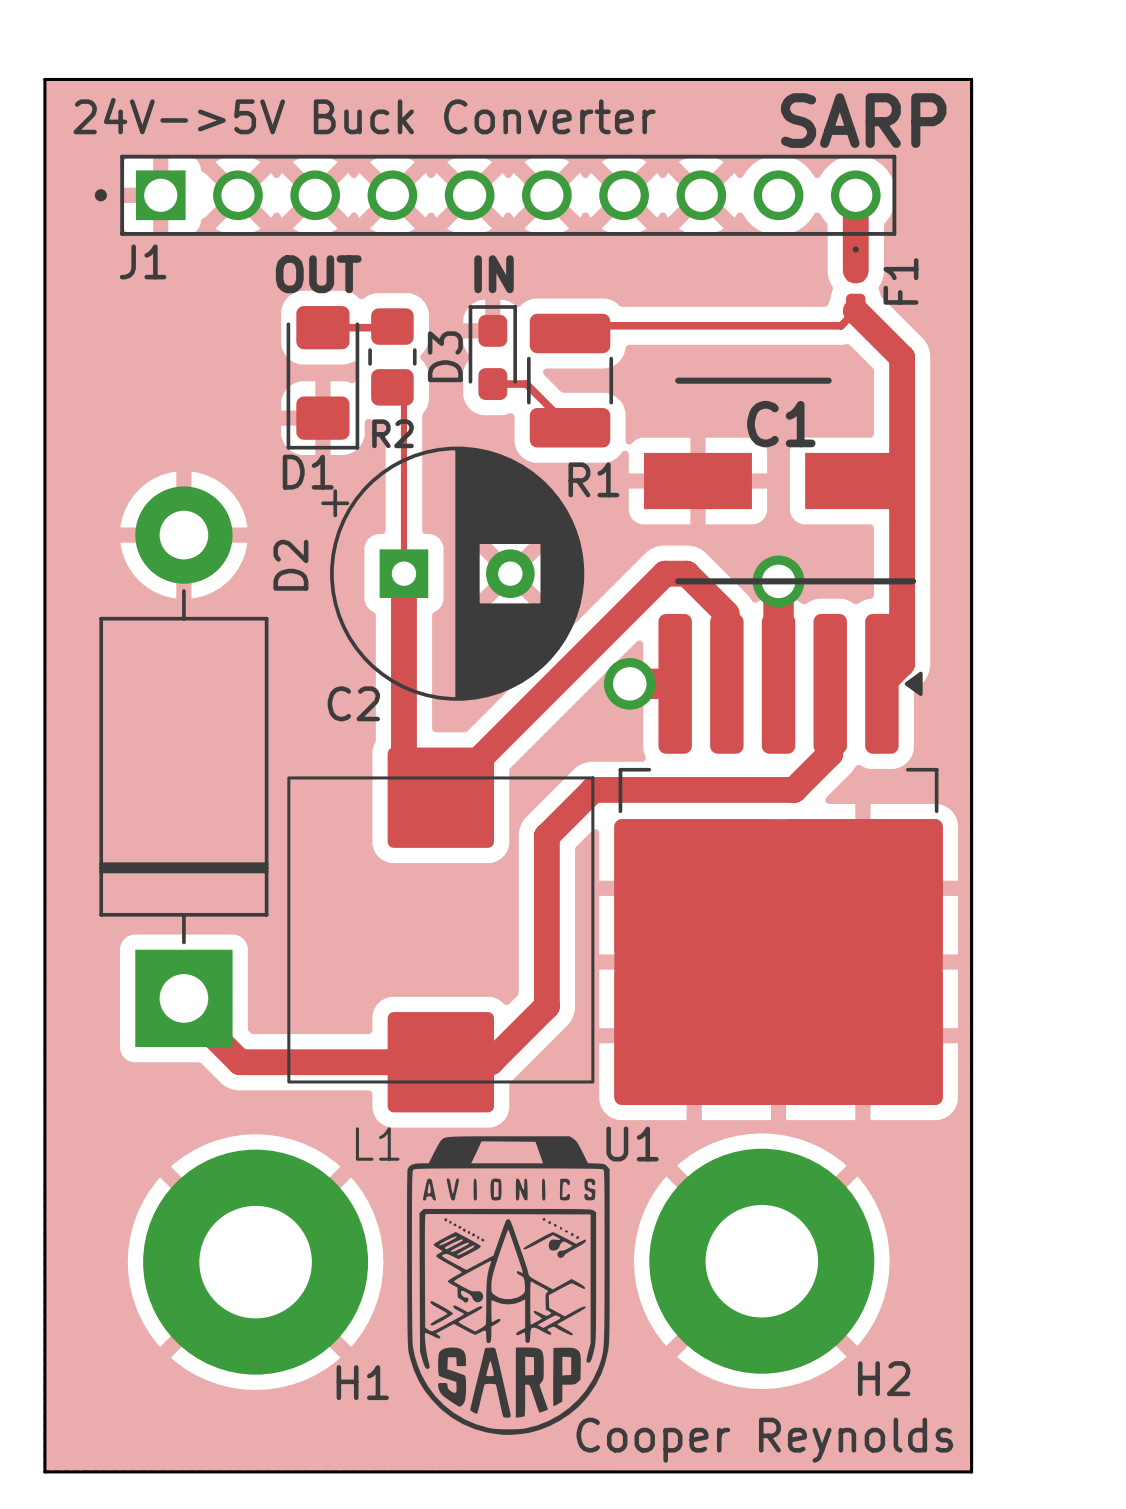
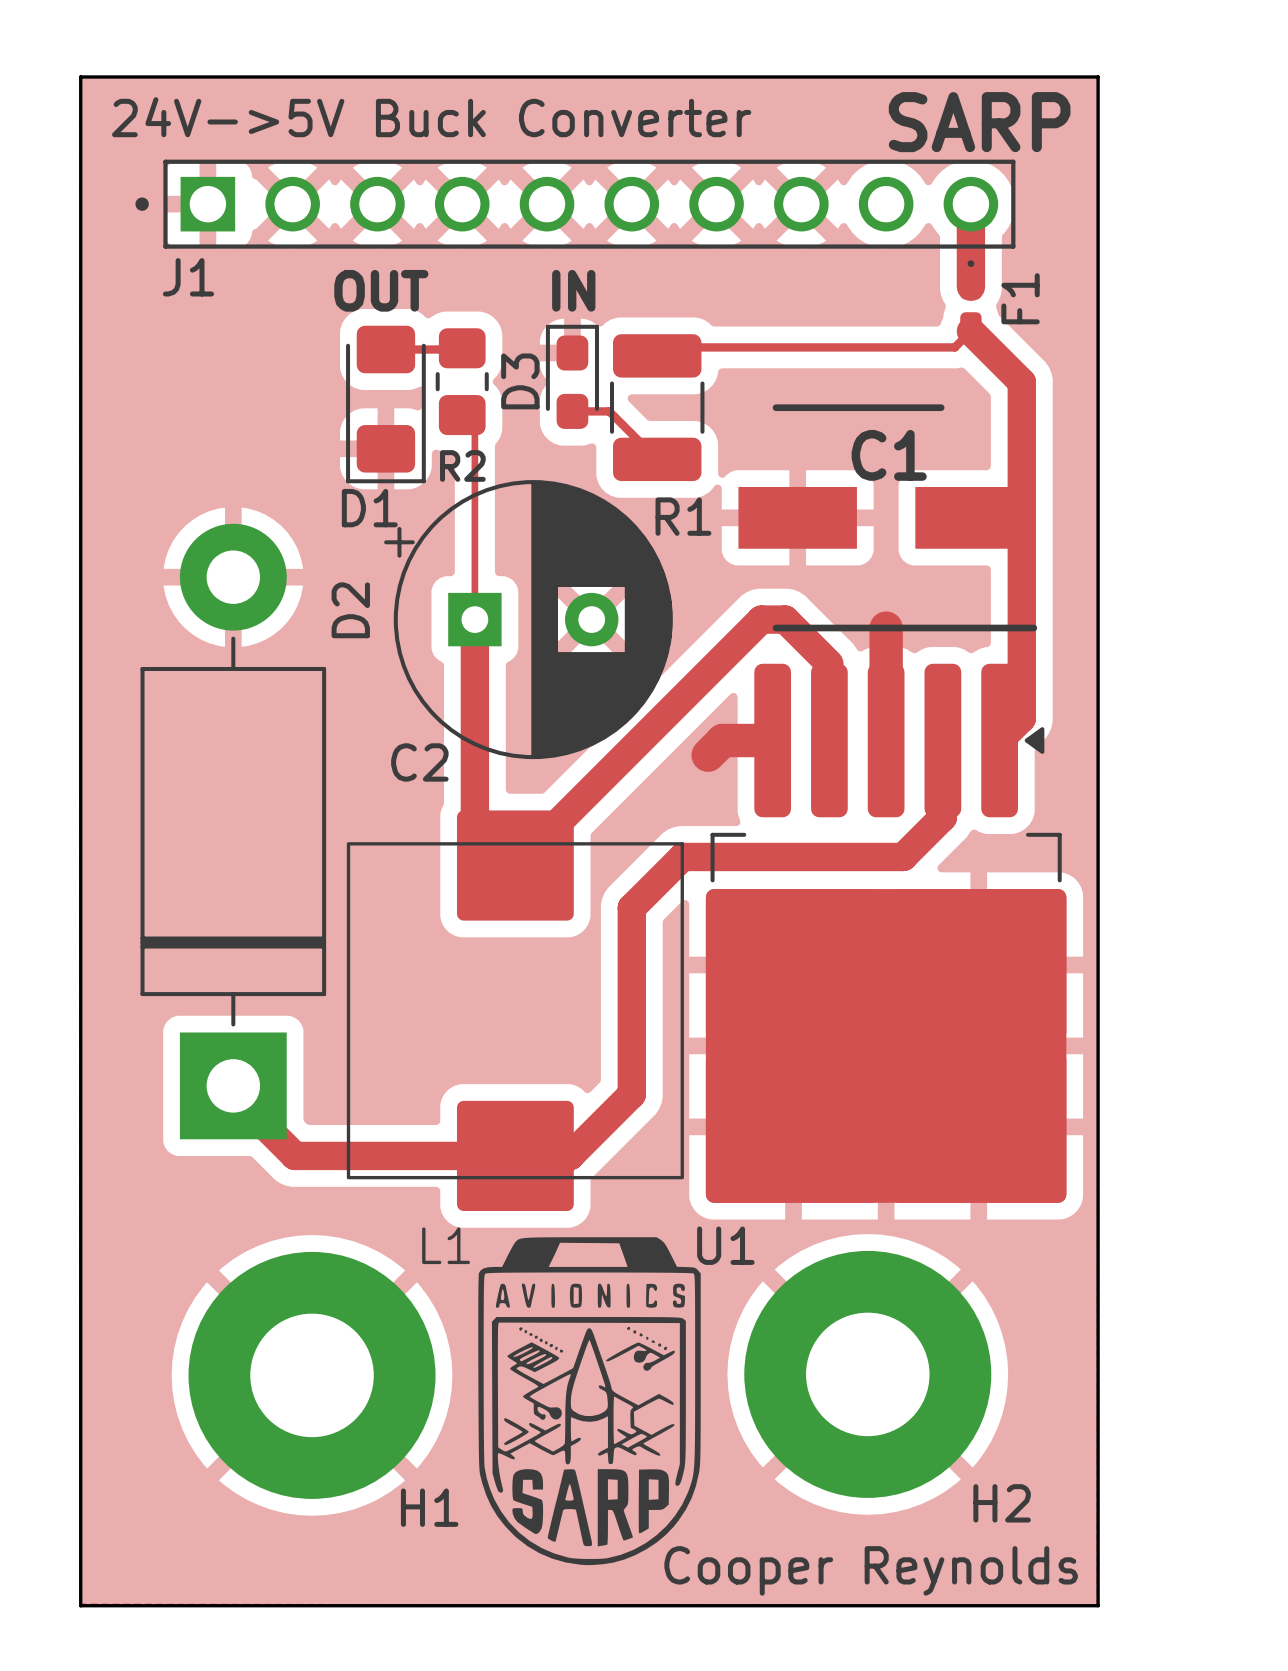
via: (778, 581) -> none
track: none -> (722, 740) (708, 755)
via: (629, 683) -> none

